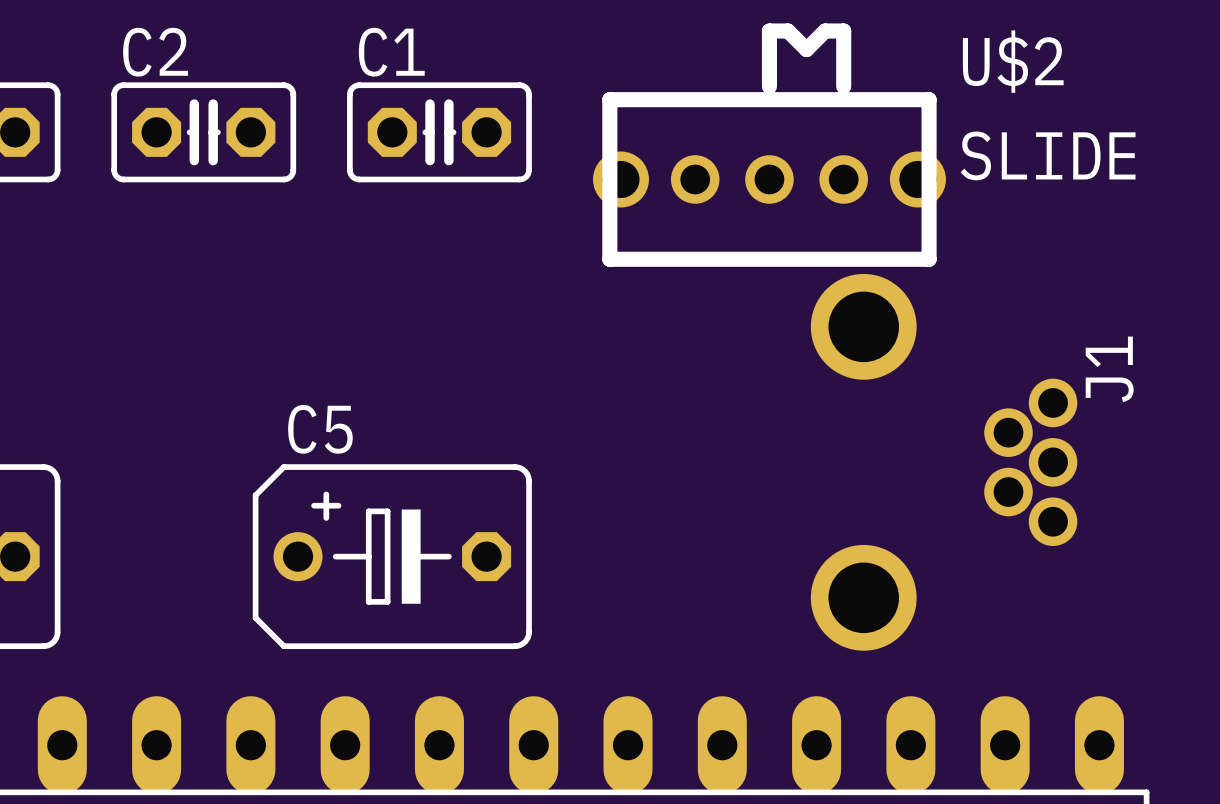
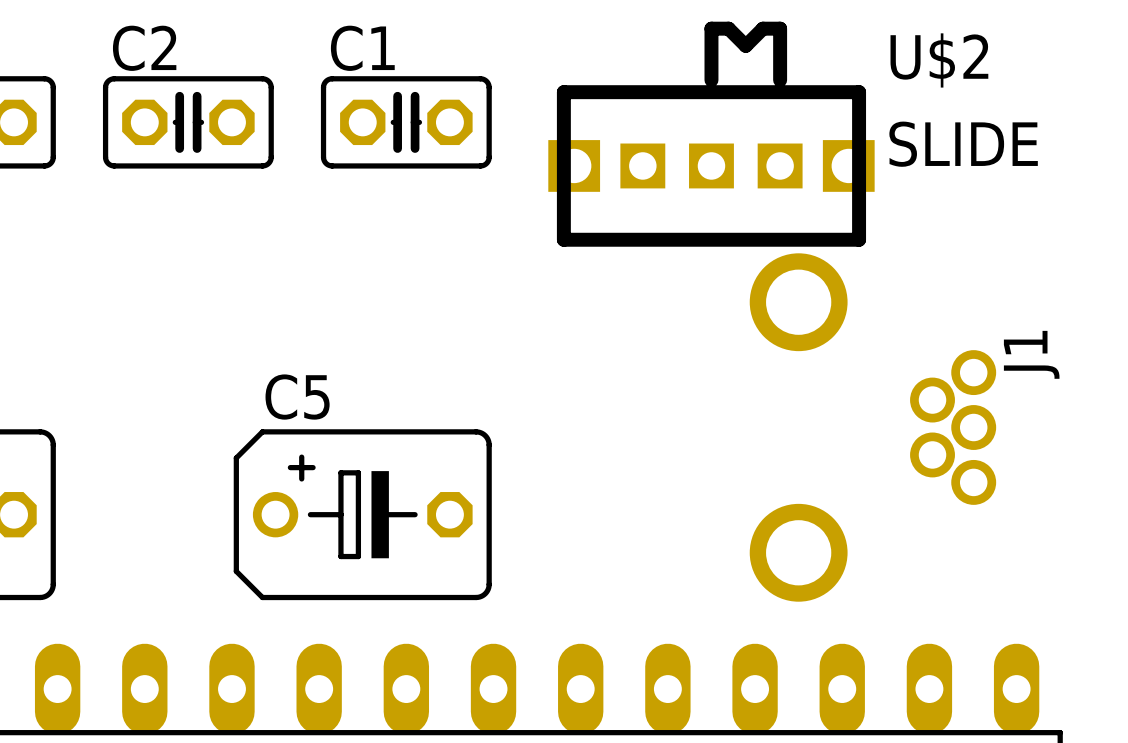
U$2 footprint: [592, 23, 946, 267] -> [548, 21, 875, 247]

